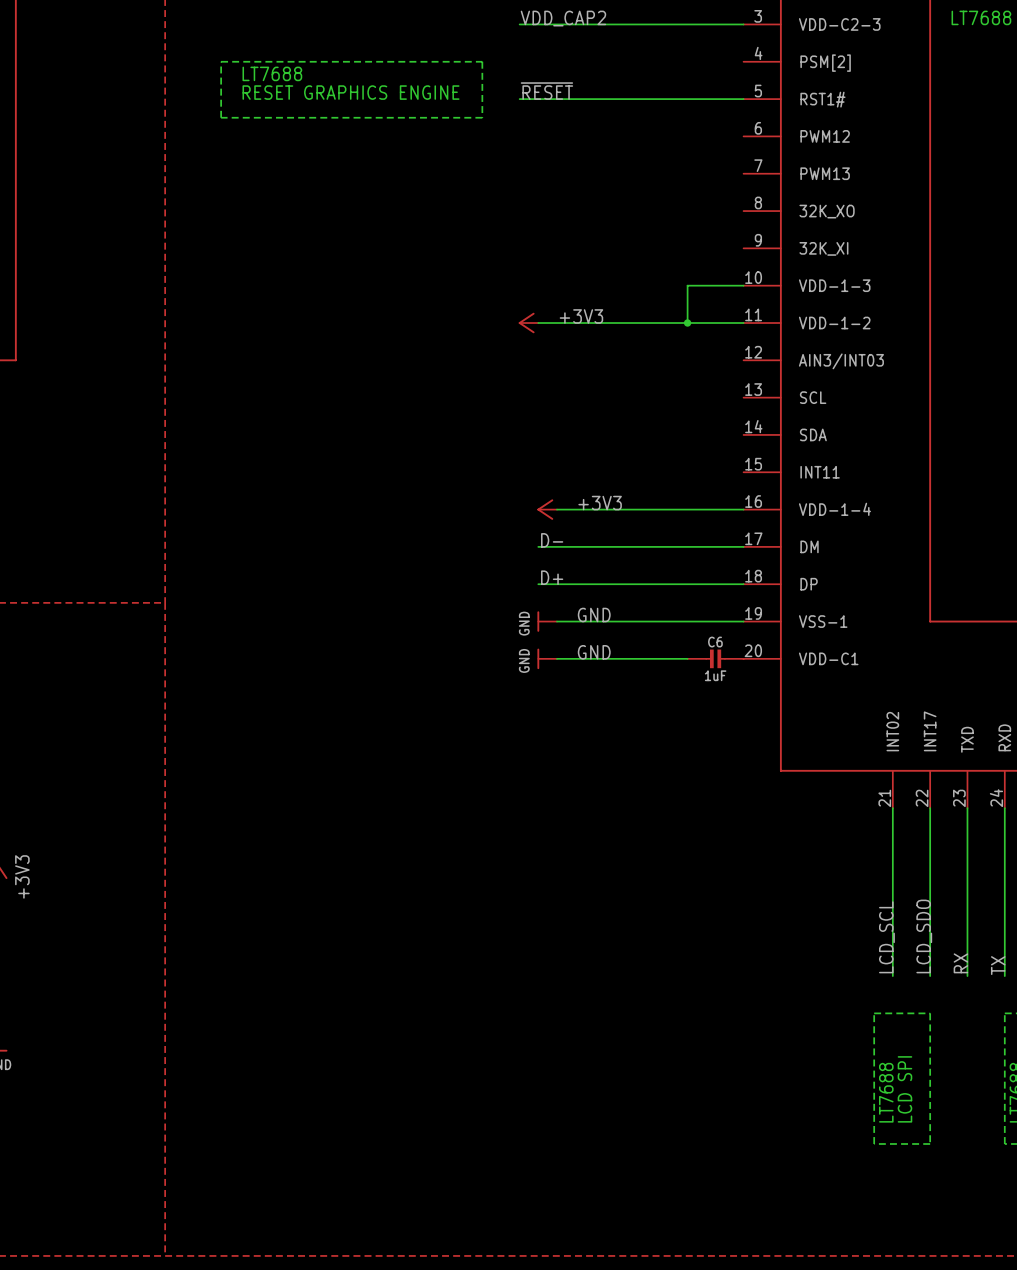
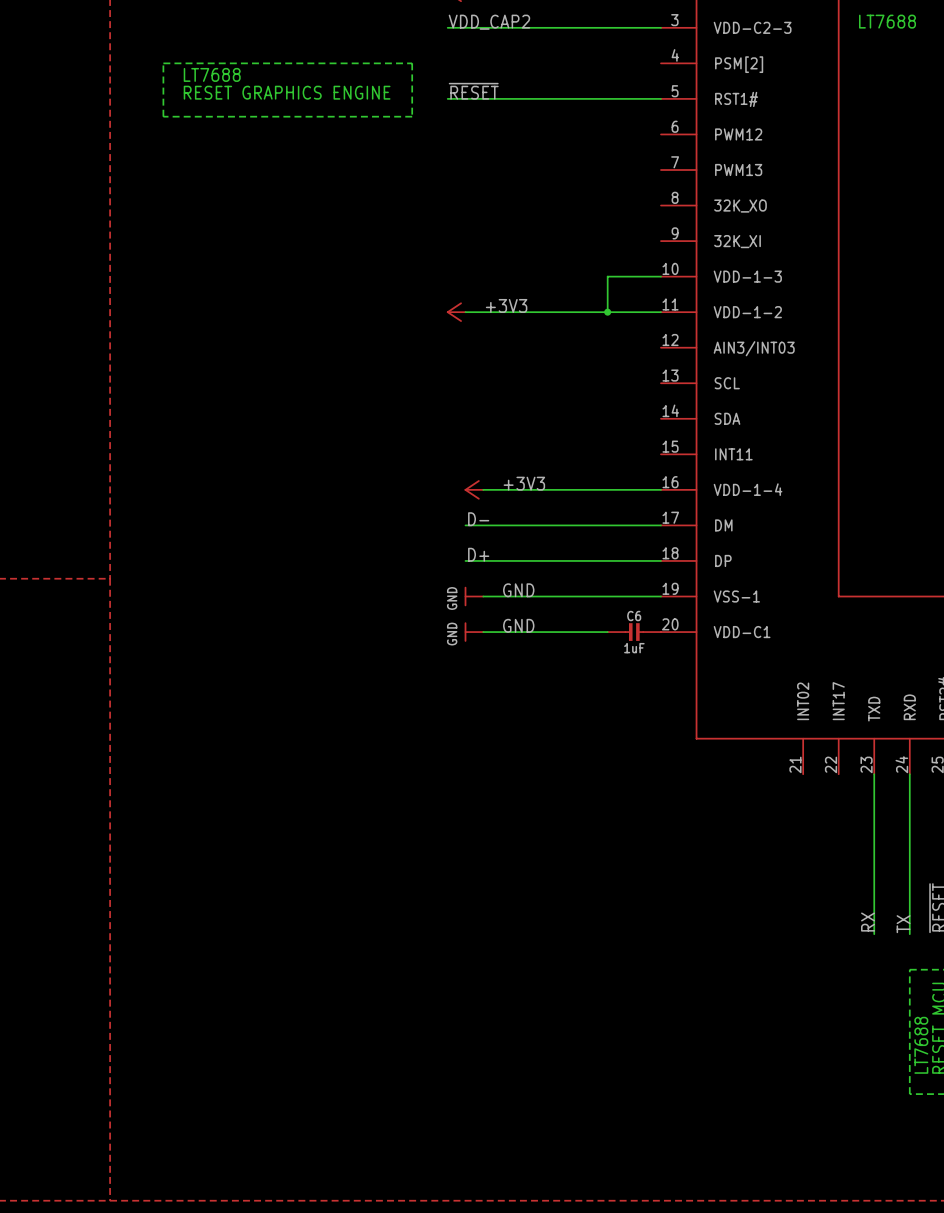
wire: (892, 808) (892, 976) -> none
wire: (930, 808) (930, 976) -> none
label: LCD_SDO (924, 936) -> none
label: LCD_SCL (886, 937) -> none
wire: (874, 1013) (930, 1013) (930, 1143) (874, 1143) (874, 1013) -> none
text: LCD SPI (904, 1089) -> none
text: LT7688 (886, 1092) -> none

